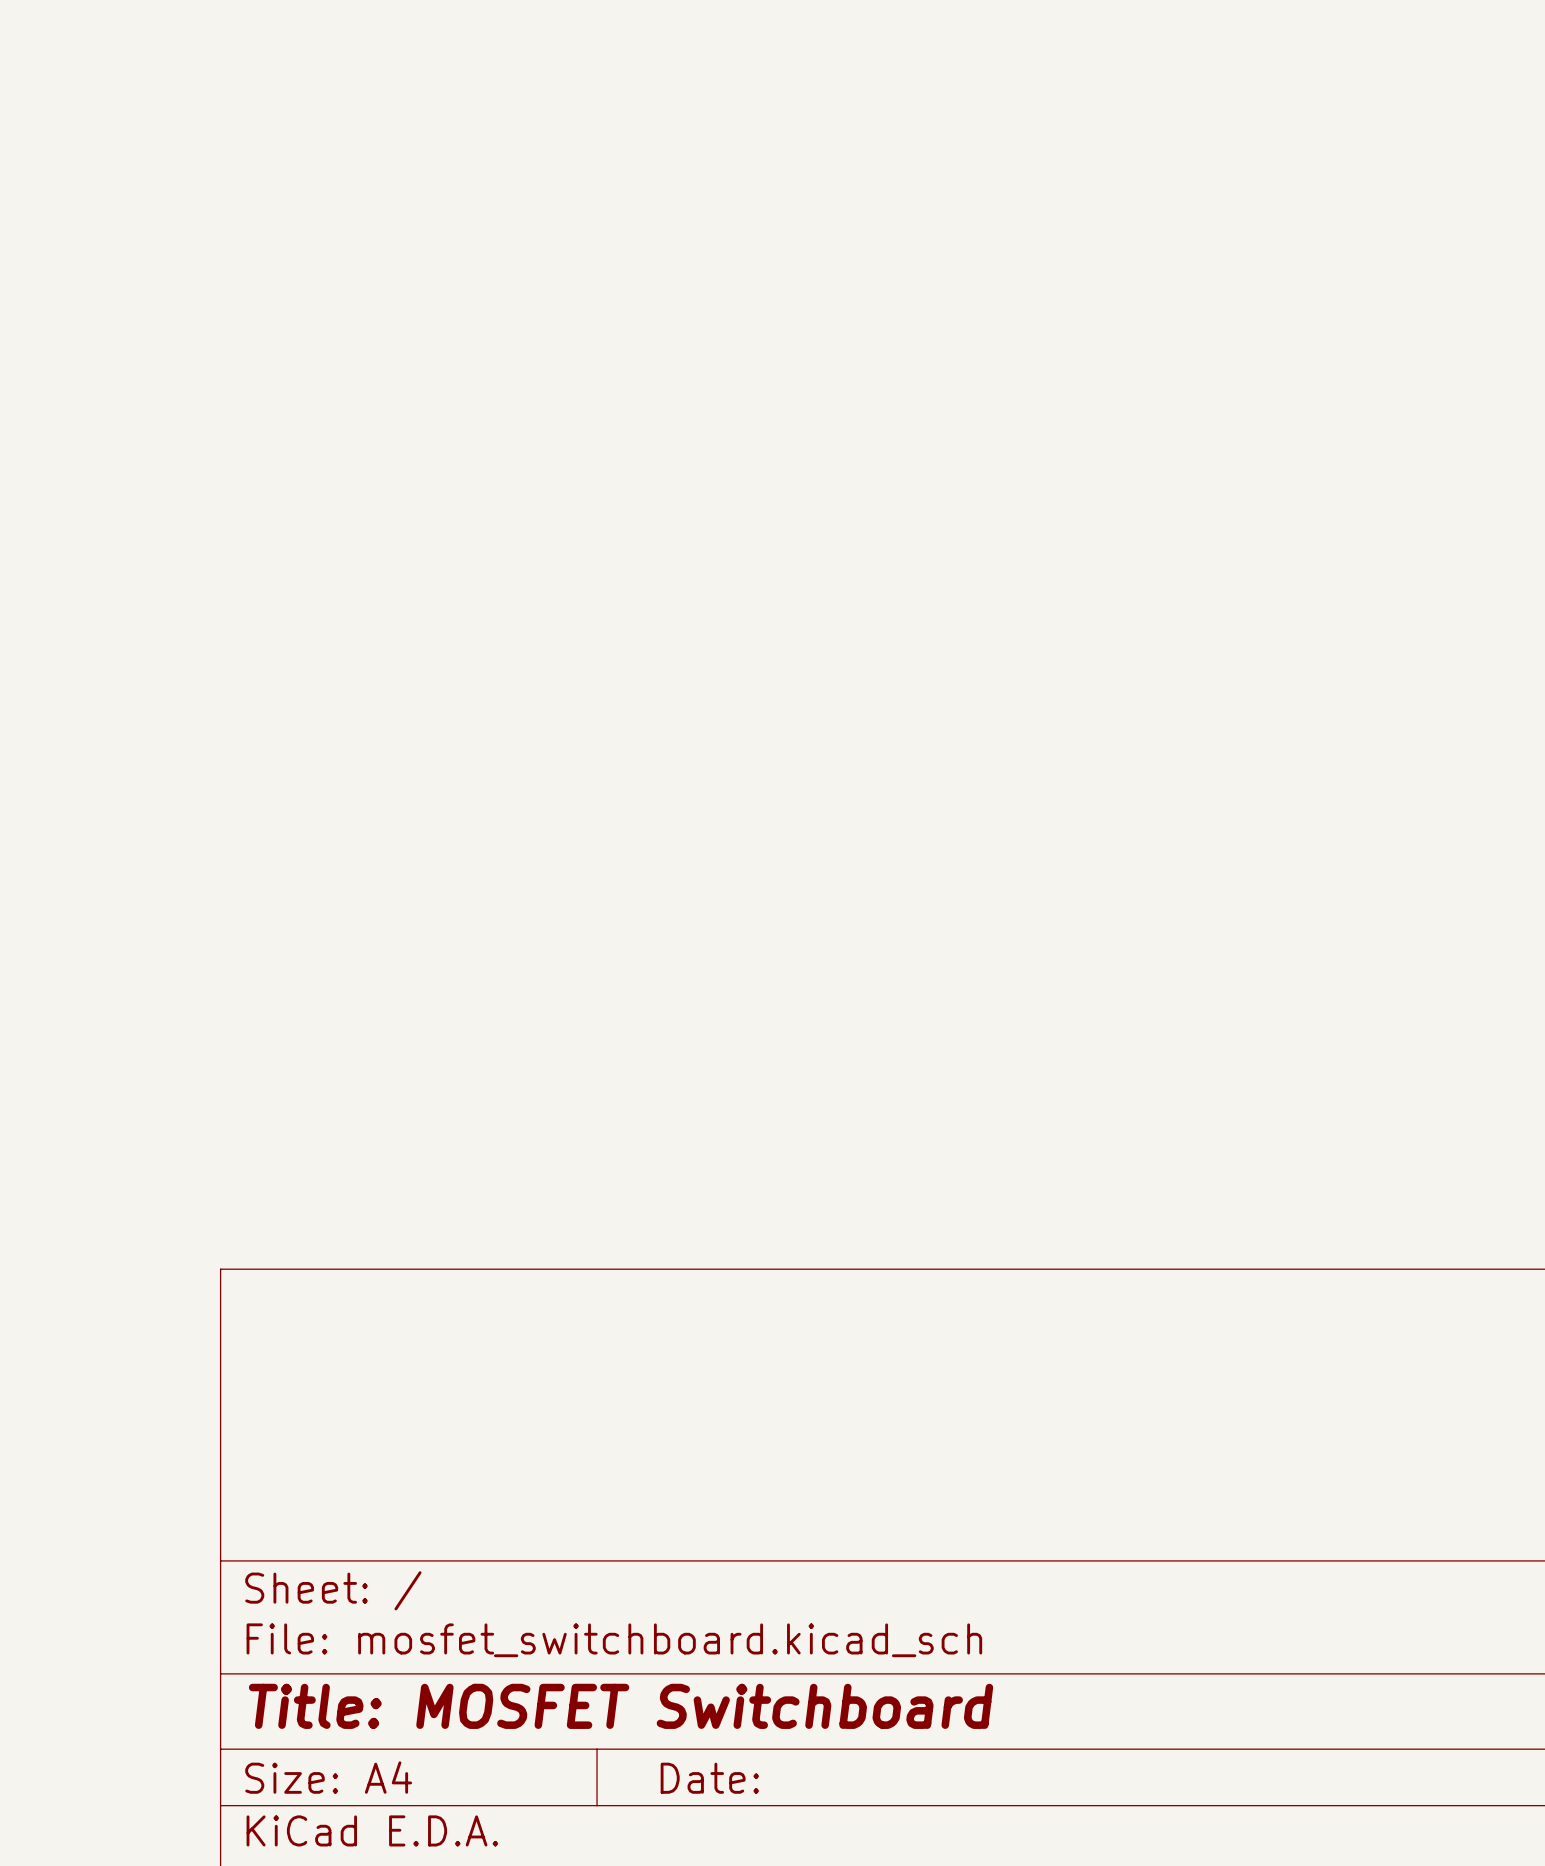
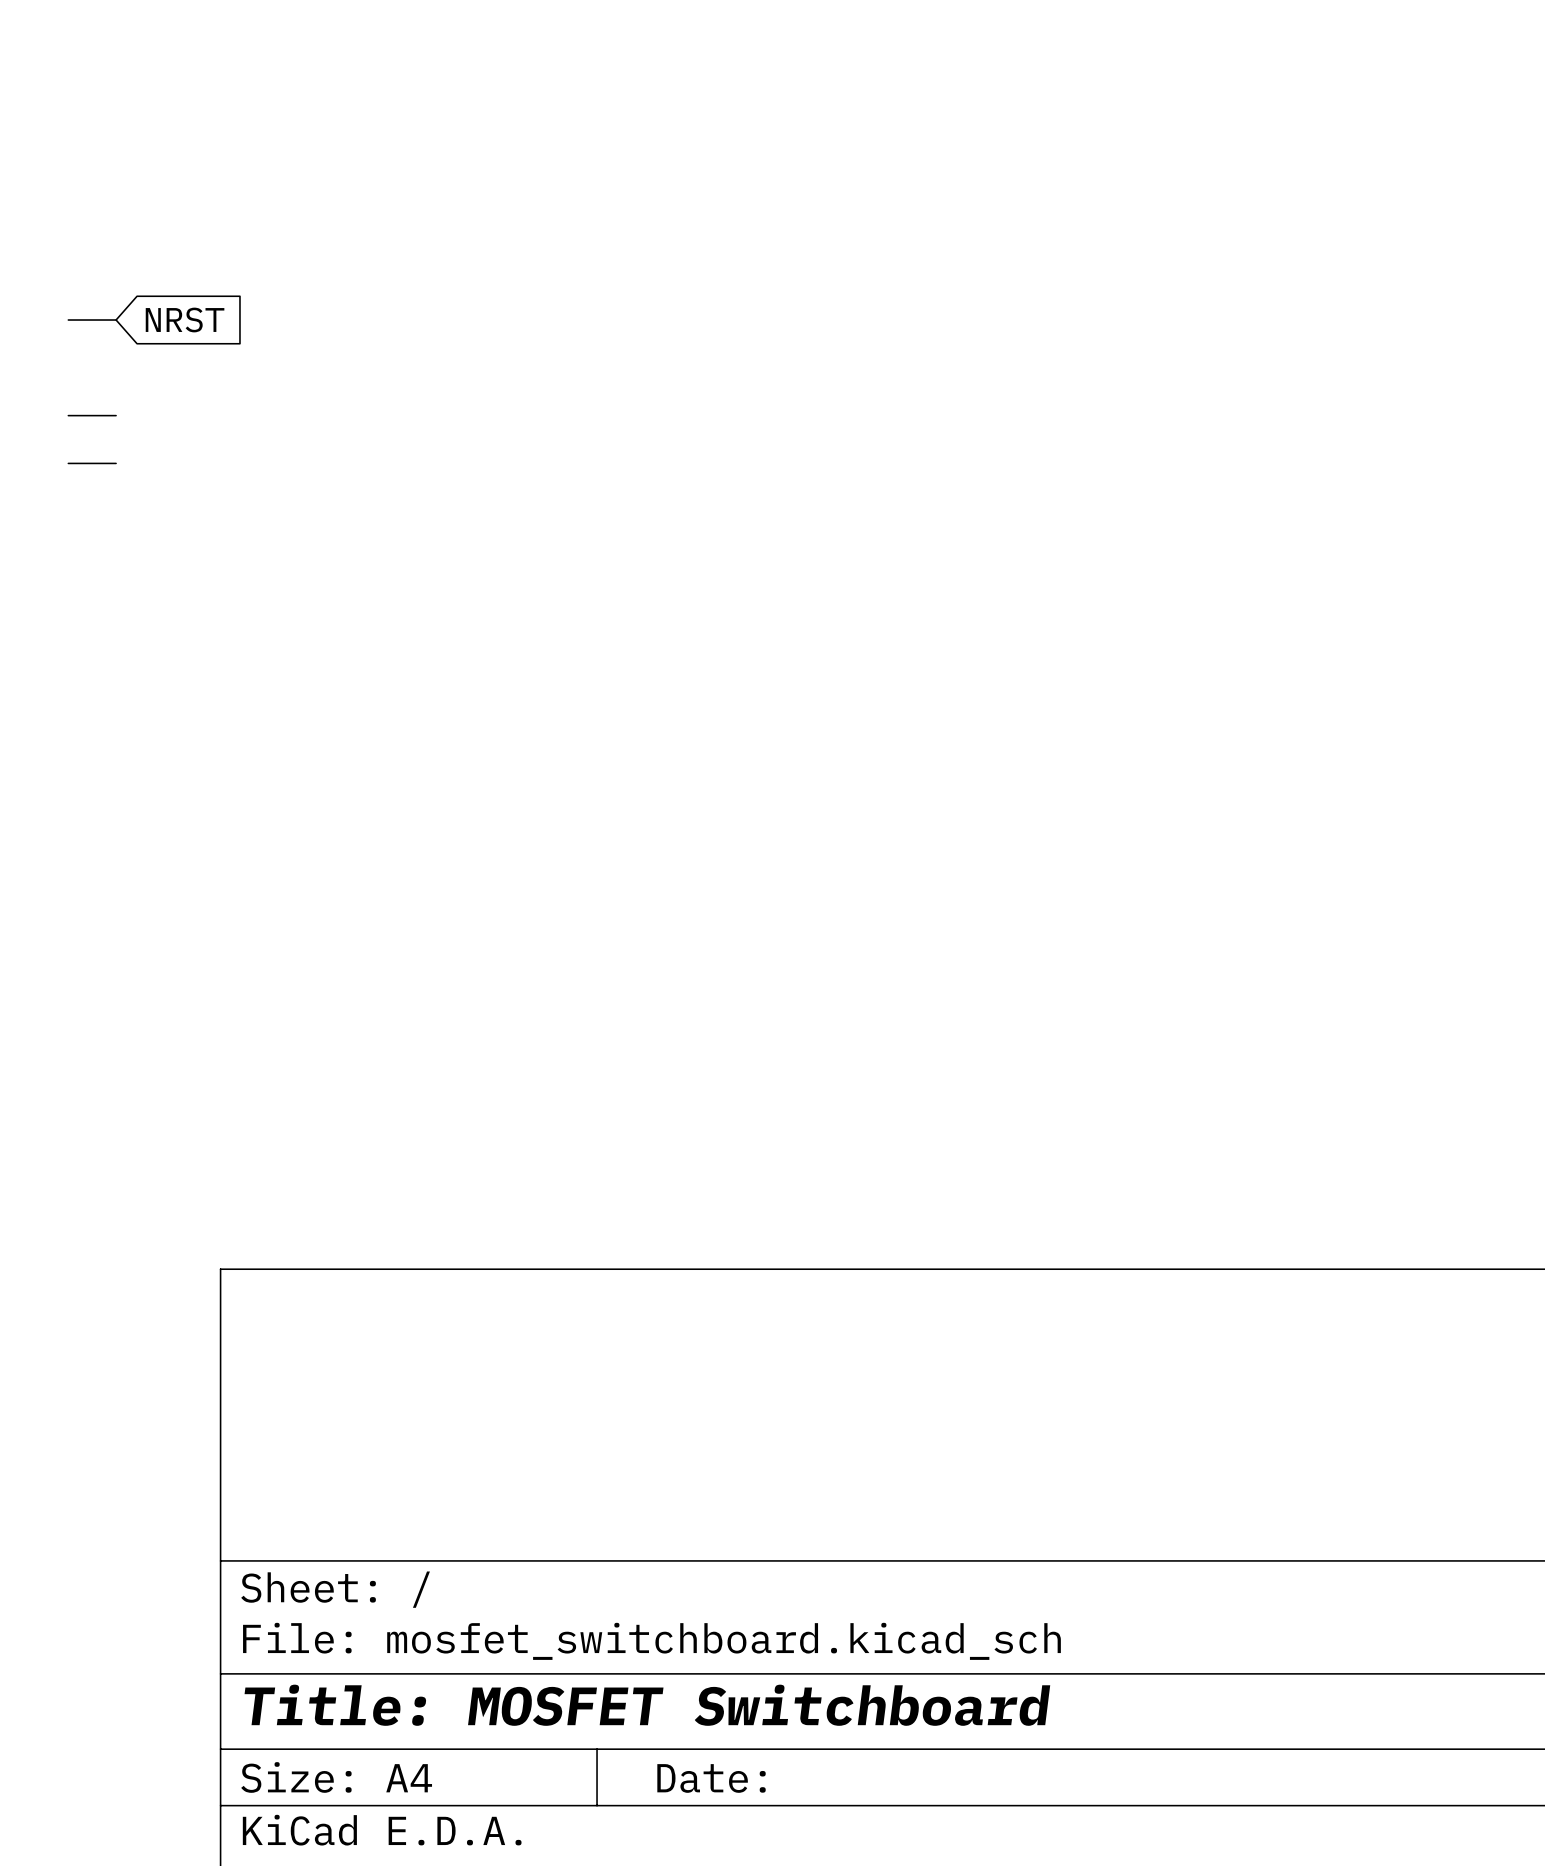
wire: none -> (68, 320) (116, 320)
global label: none -> NRST (185, 320)
wire: none -> (68, 415) (116, 415)
wire: none -> (68, 463) (116, 463)

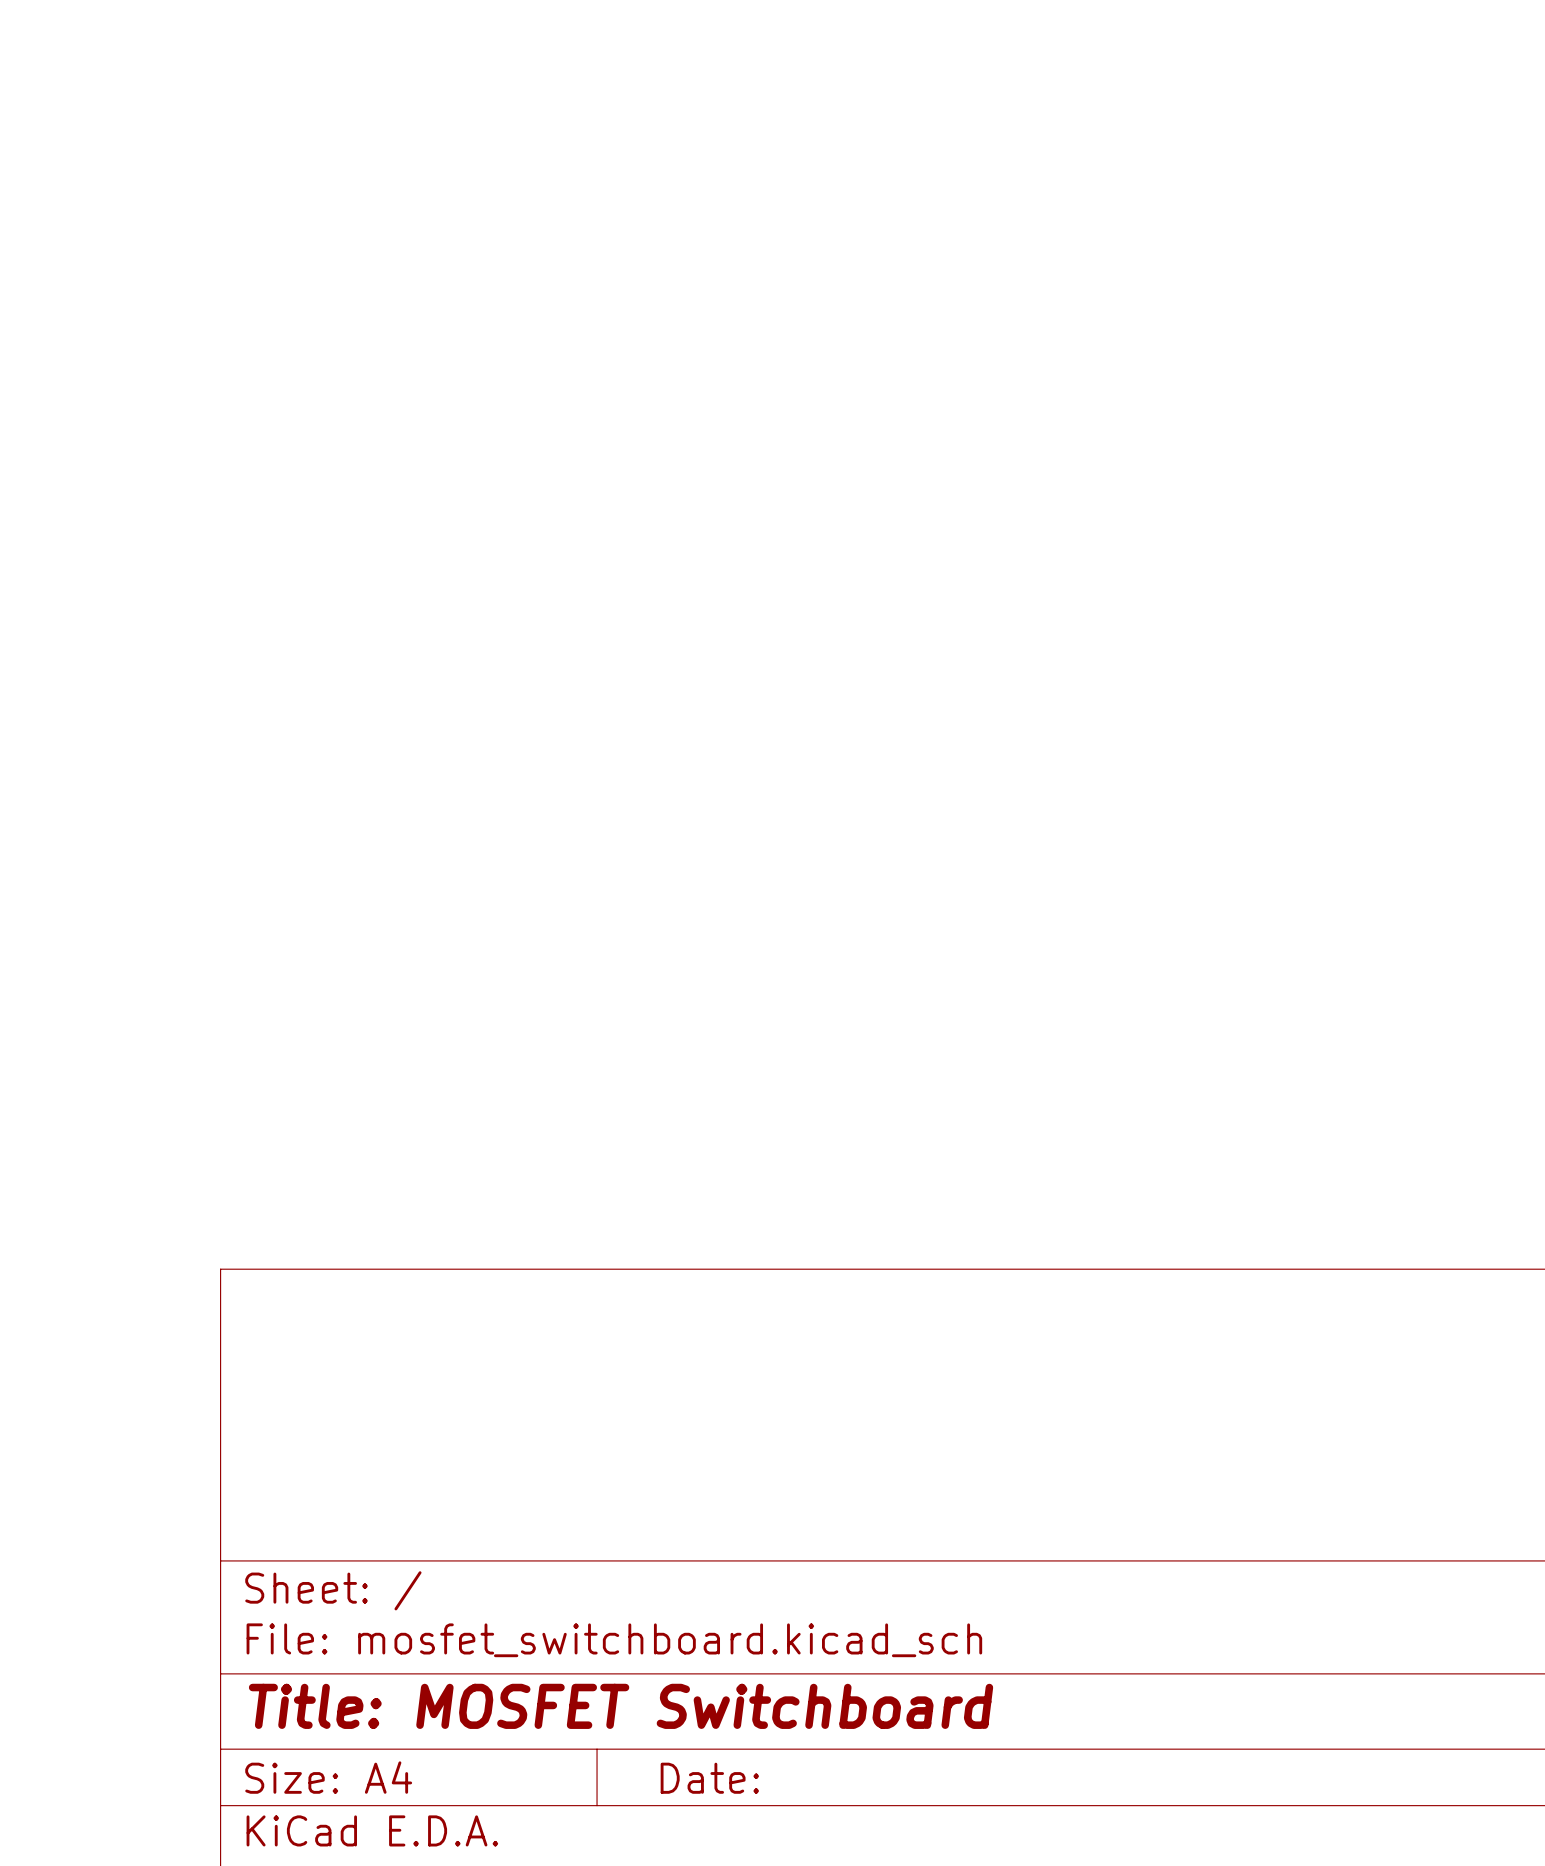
wire: (68, 320) (116, 320) -> none
global label: NRST (185, 320) -> none
wire: (68, 415) (116, 415) -> none
wire: (68, 463) (116, 463) -> none

